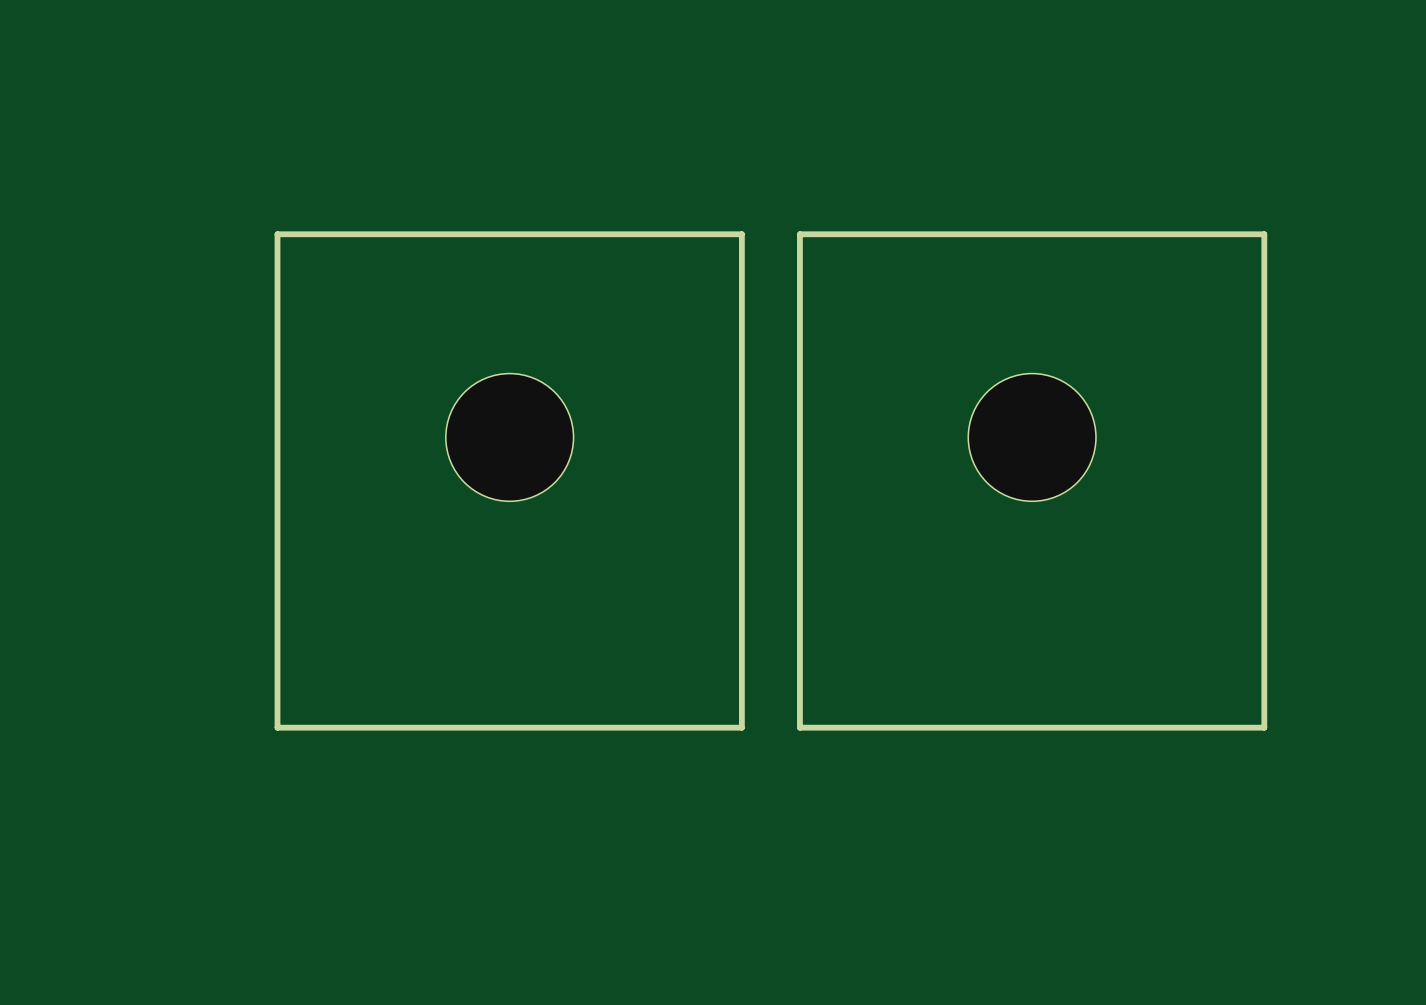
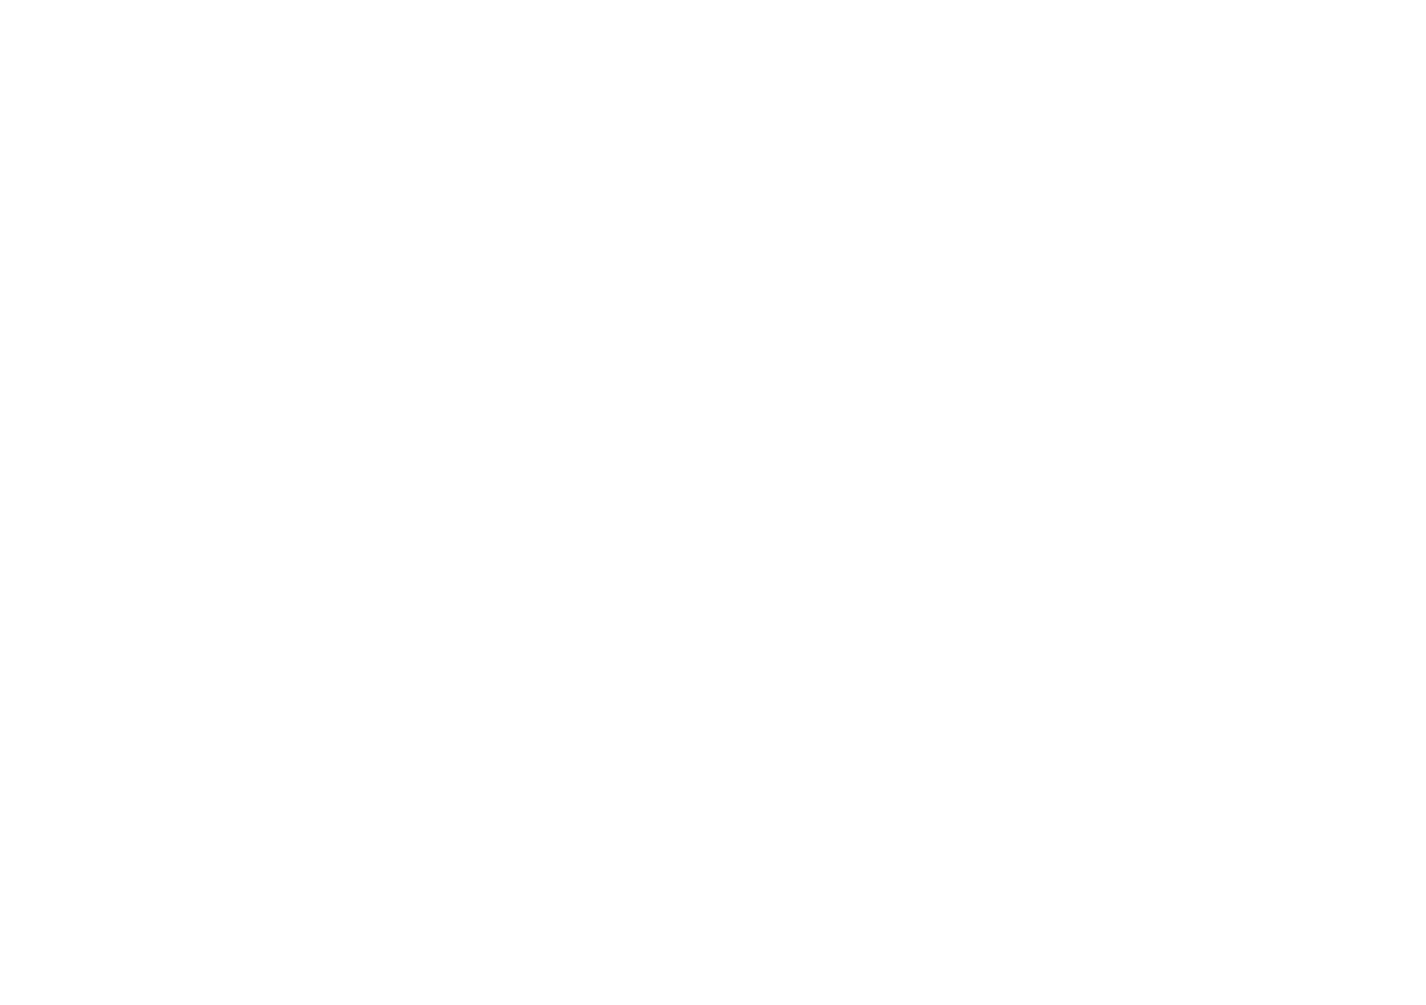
board edge: (741, 234) (741, 727) (277, 727) (277, 234) (741, 234) -> none
board edge: (1264, 234) (1264, 727) (799, 727) (799, 234) (1264, 234) -> none
part: (509, 437) -> none
part: (1032, 437) -> none

